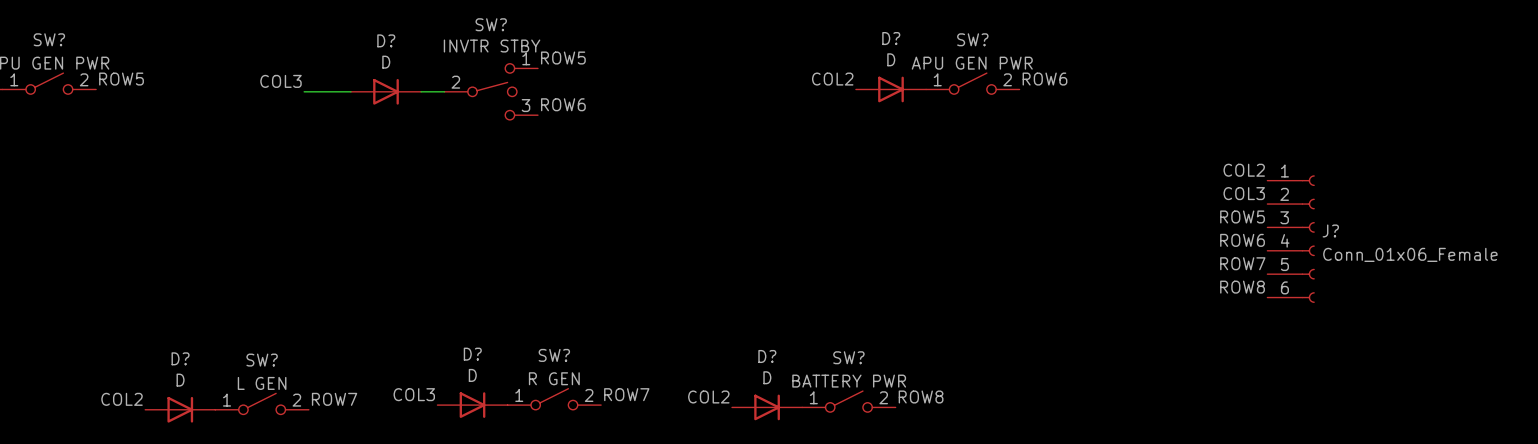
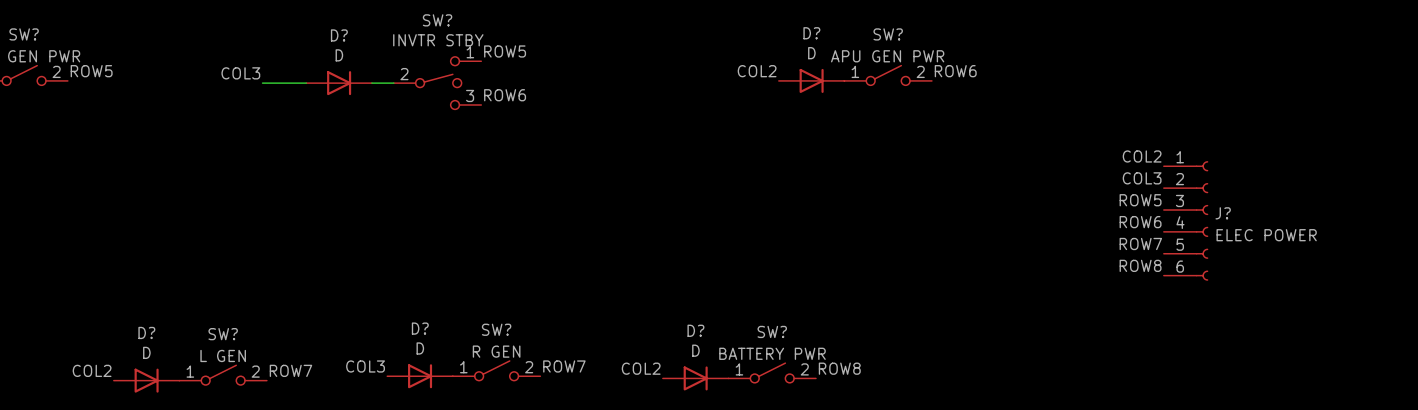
J? value: Conn_01x06_Female (1410, 254) -> ELEC POWER (1266, 235)

